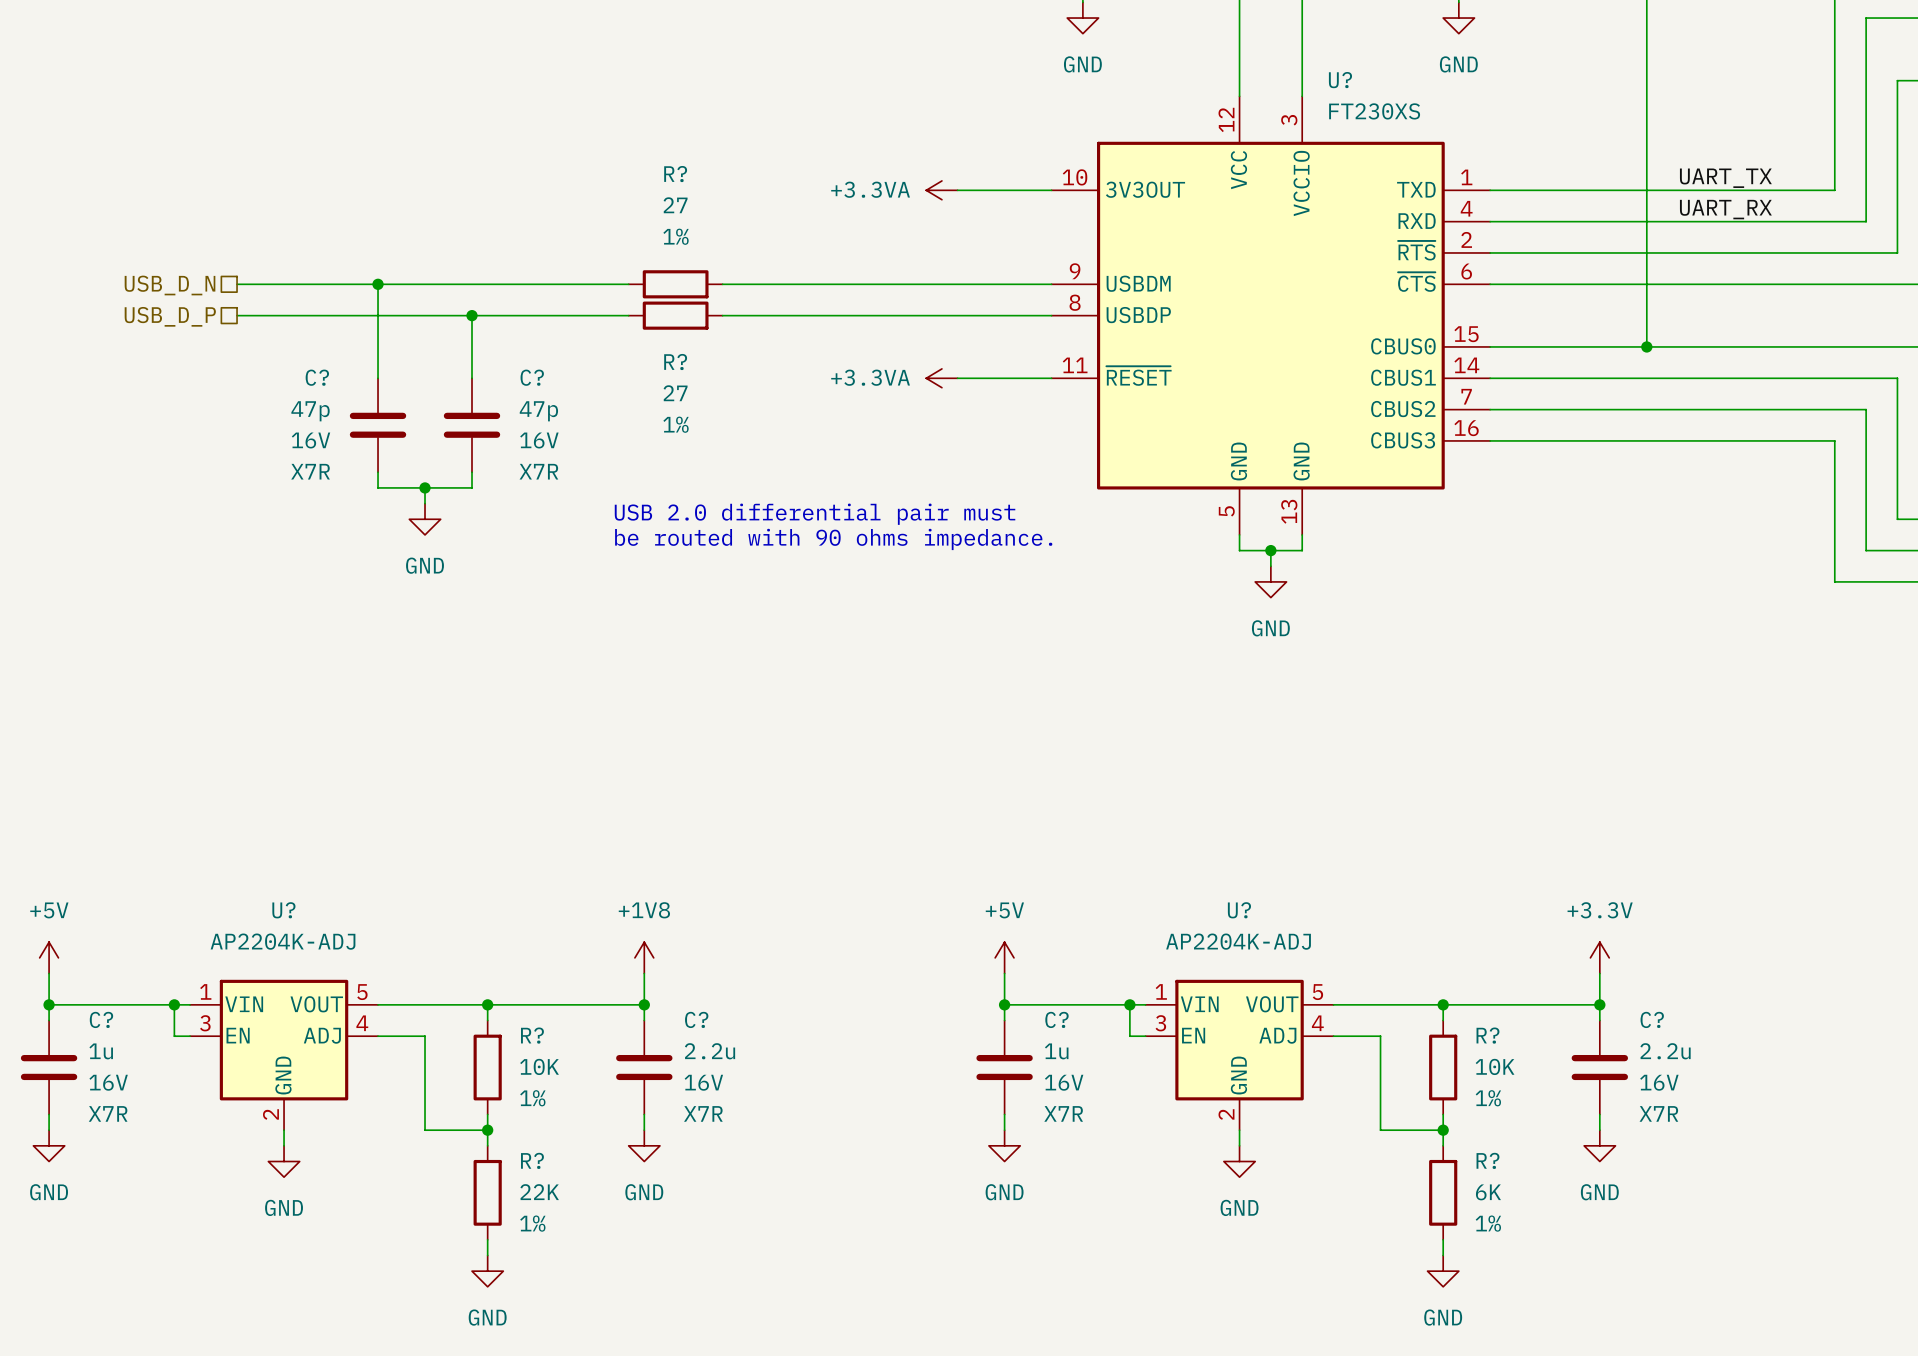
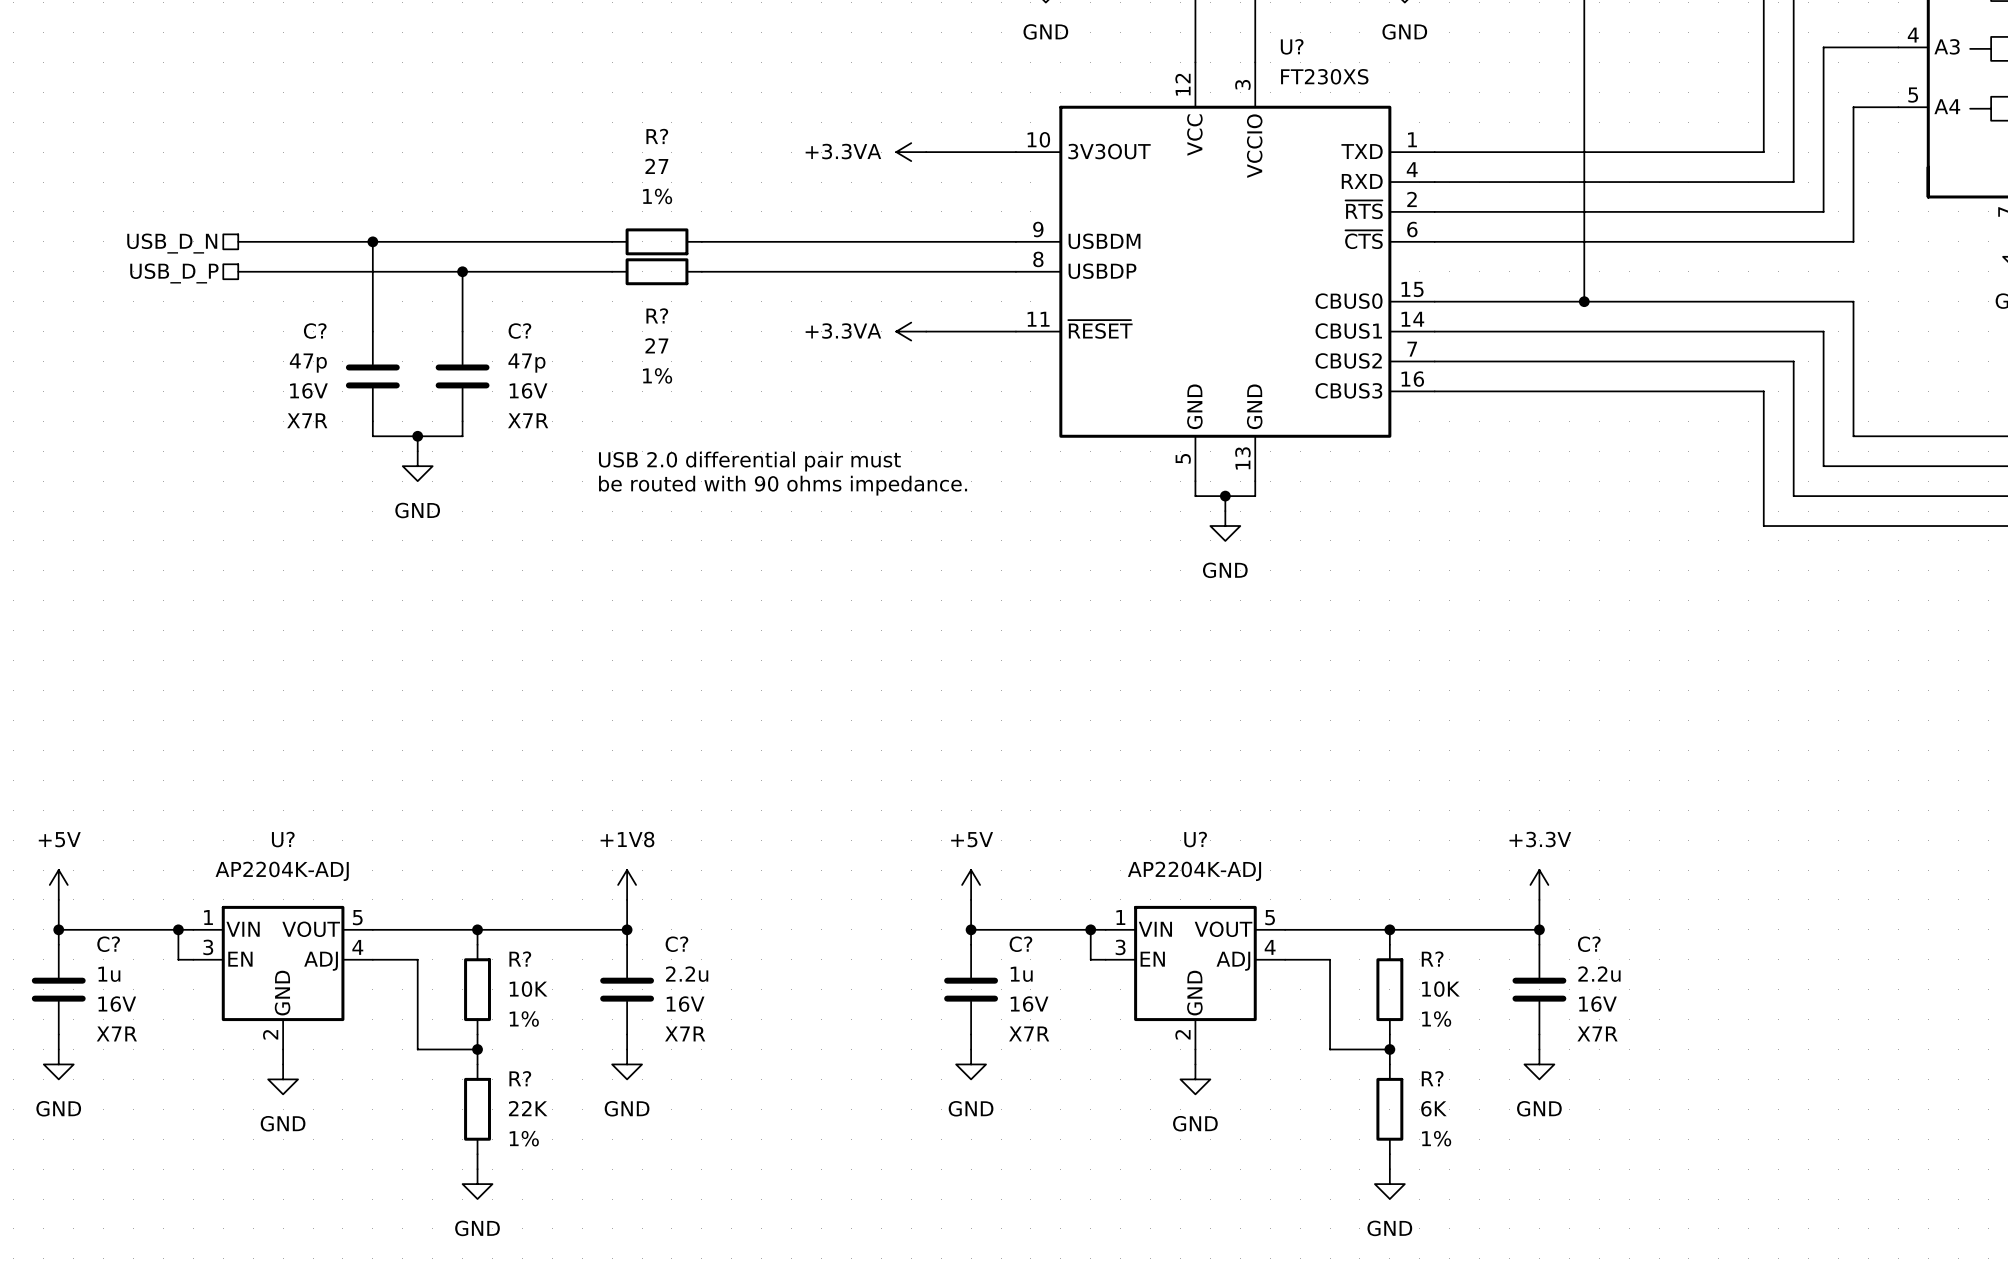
label: UART_TX (1725, 178) -> none
label: UART_RX (1725, 209) -> none

